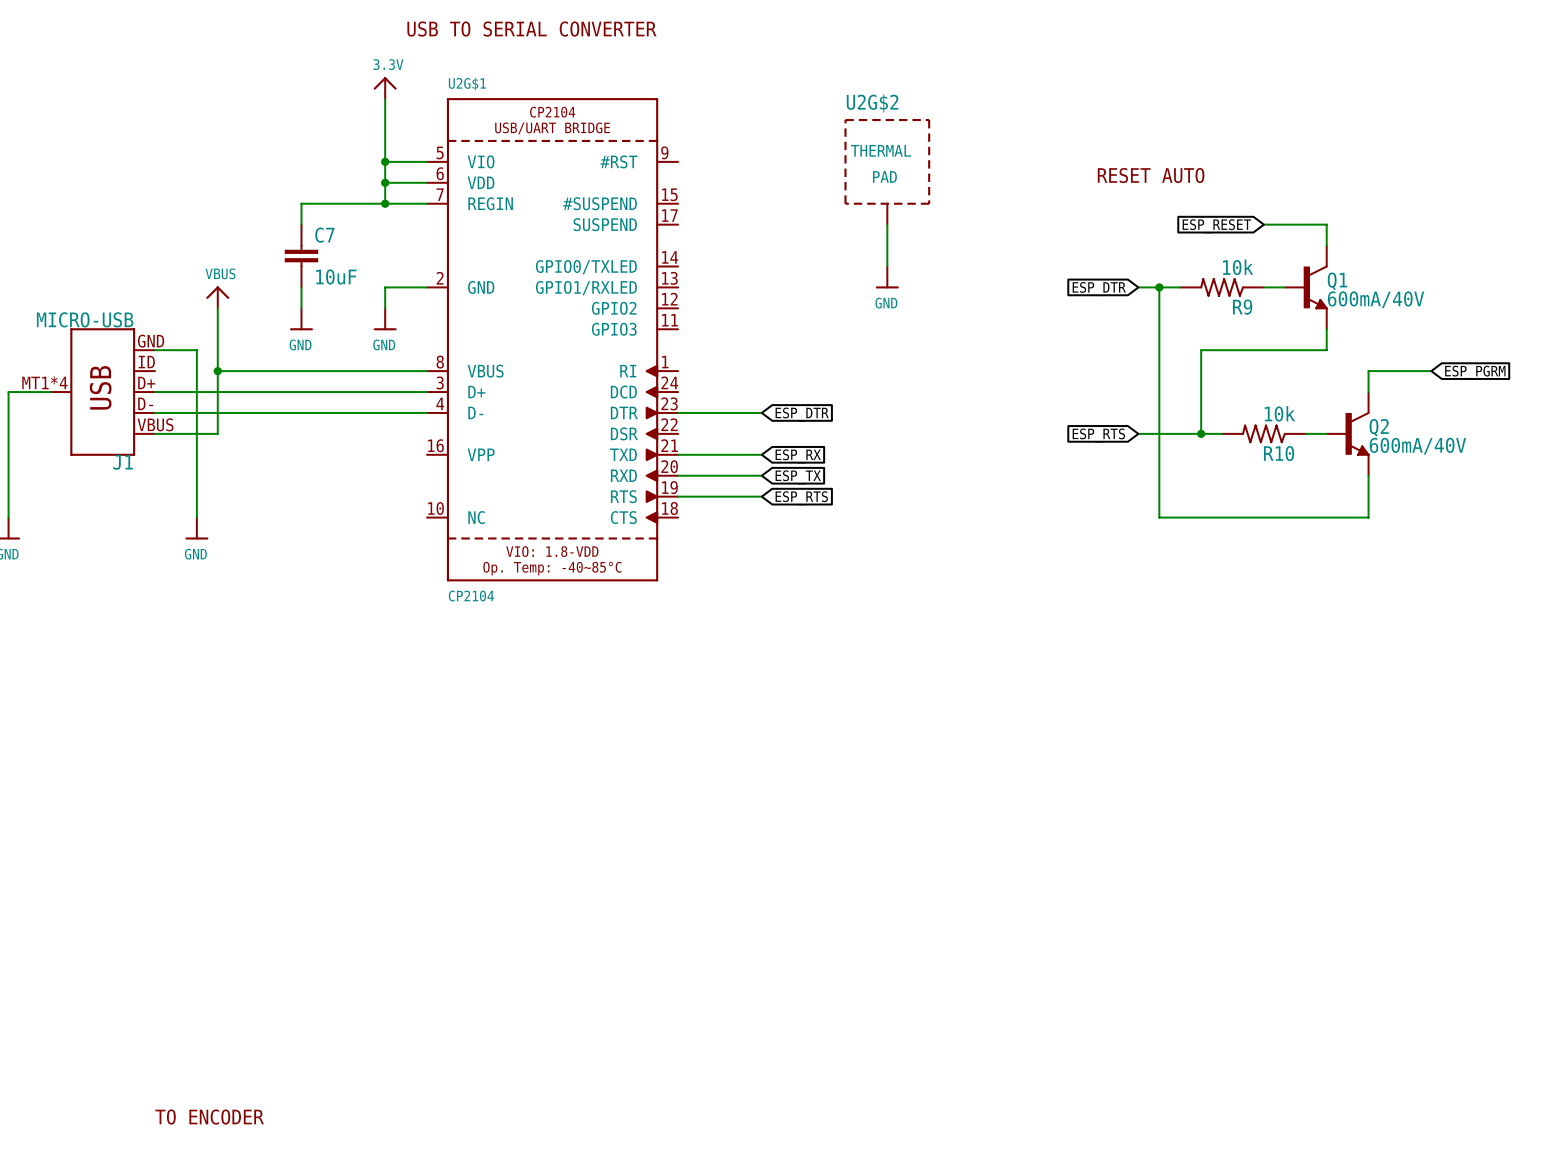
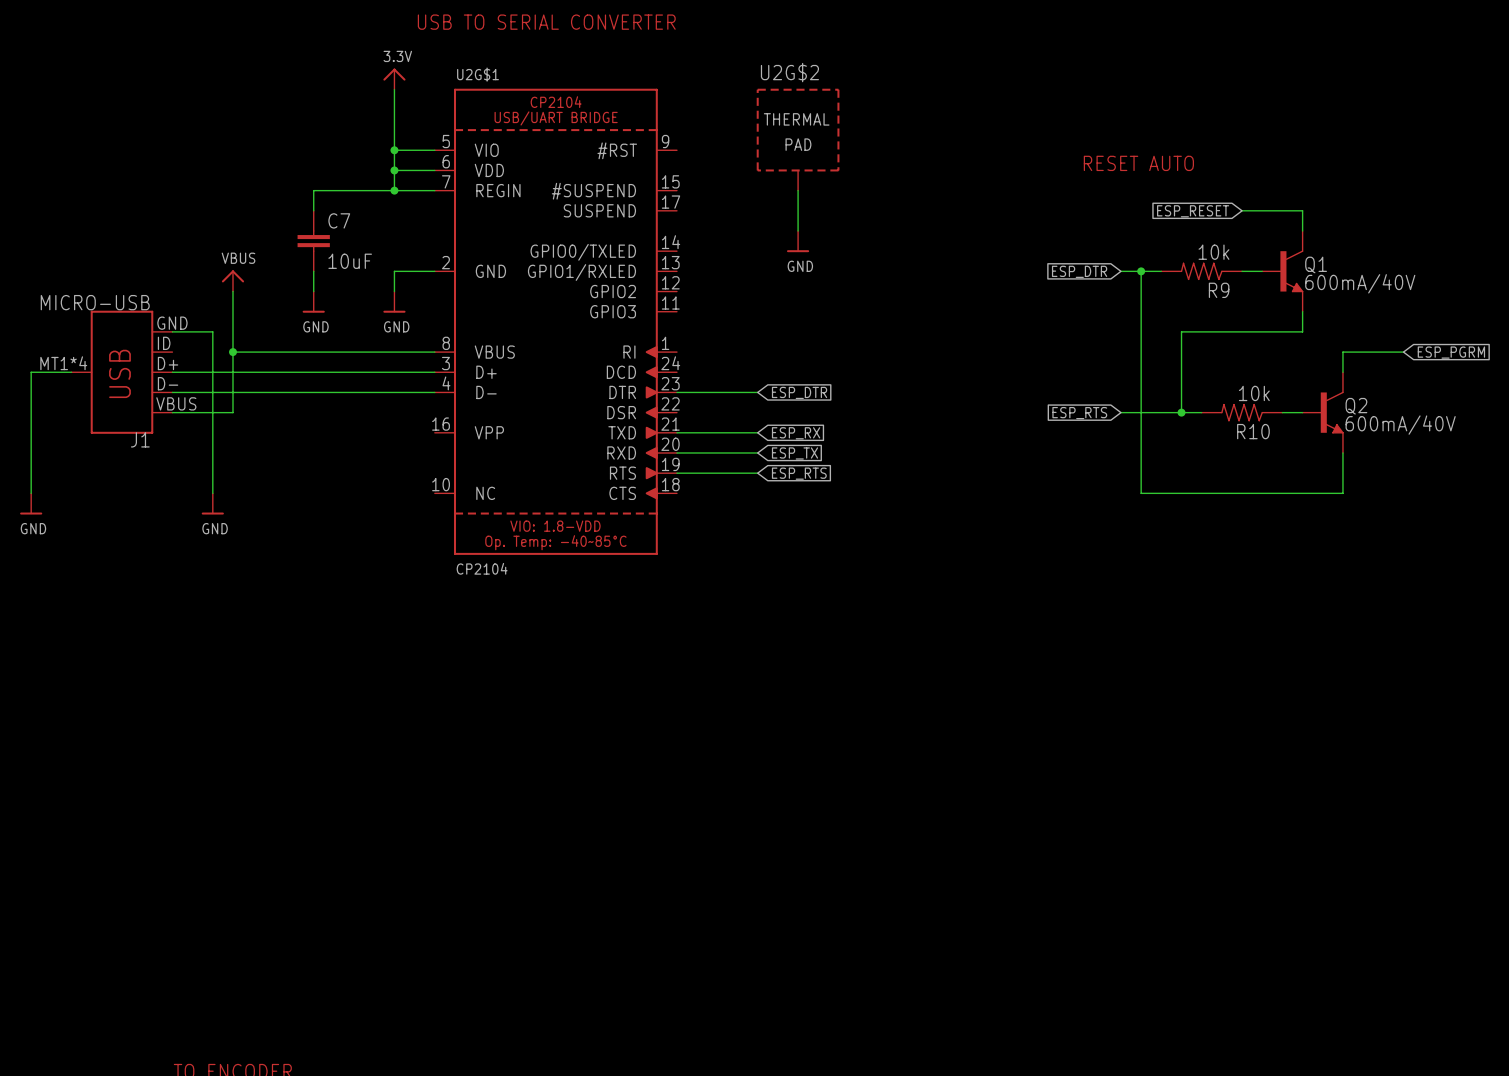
U2G$2 position: (887, 171) -> (798, 139)
wire: (887, 224) (887, 266) -> (798, 190) (798, 230)
power symbol position: GND (887, 277) -> GND (798, 241)

